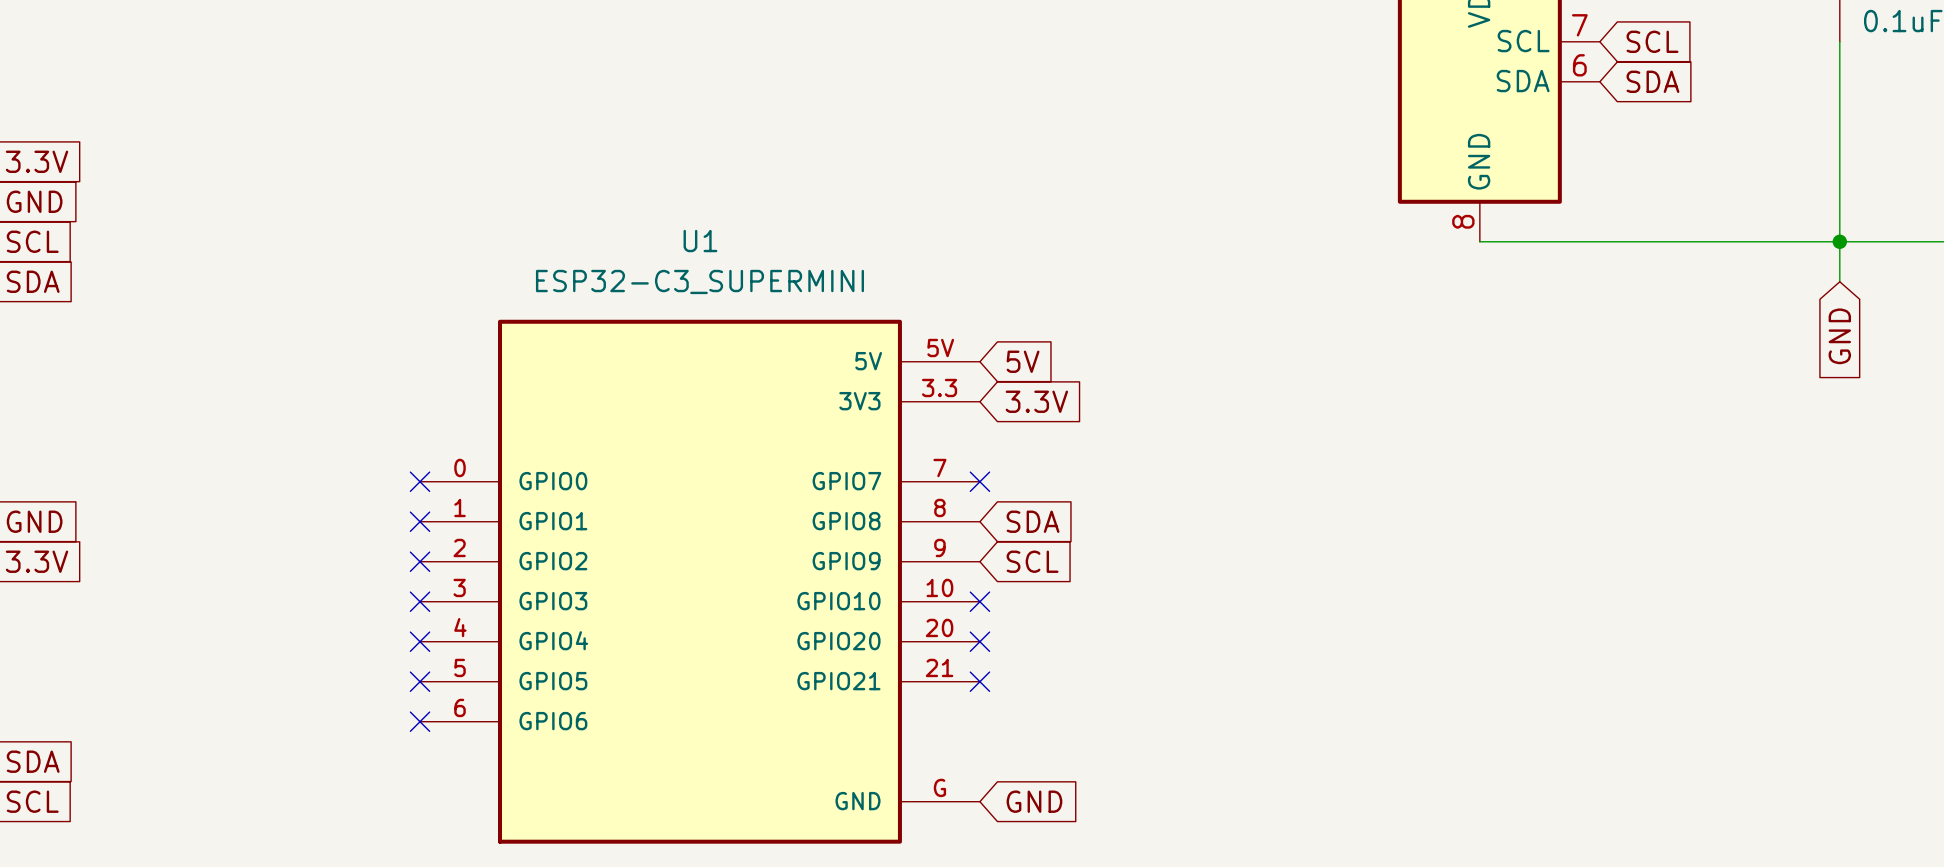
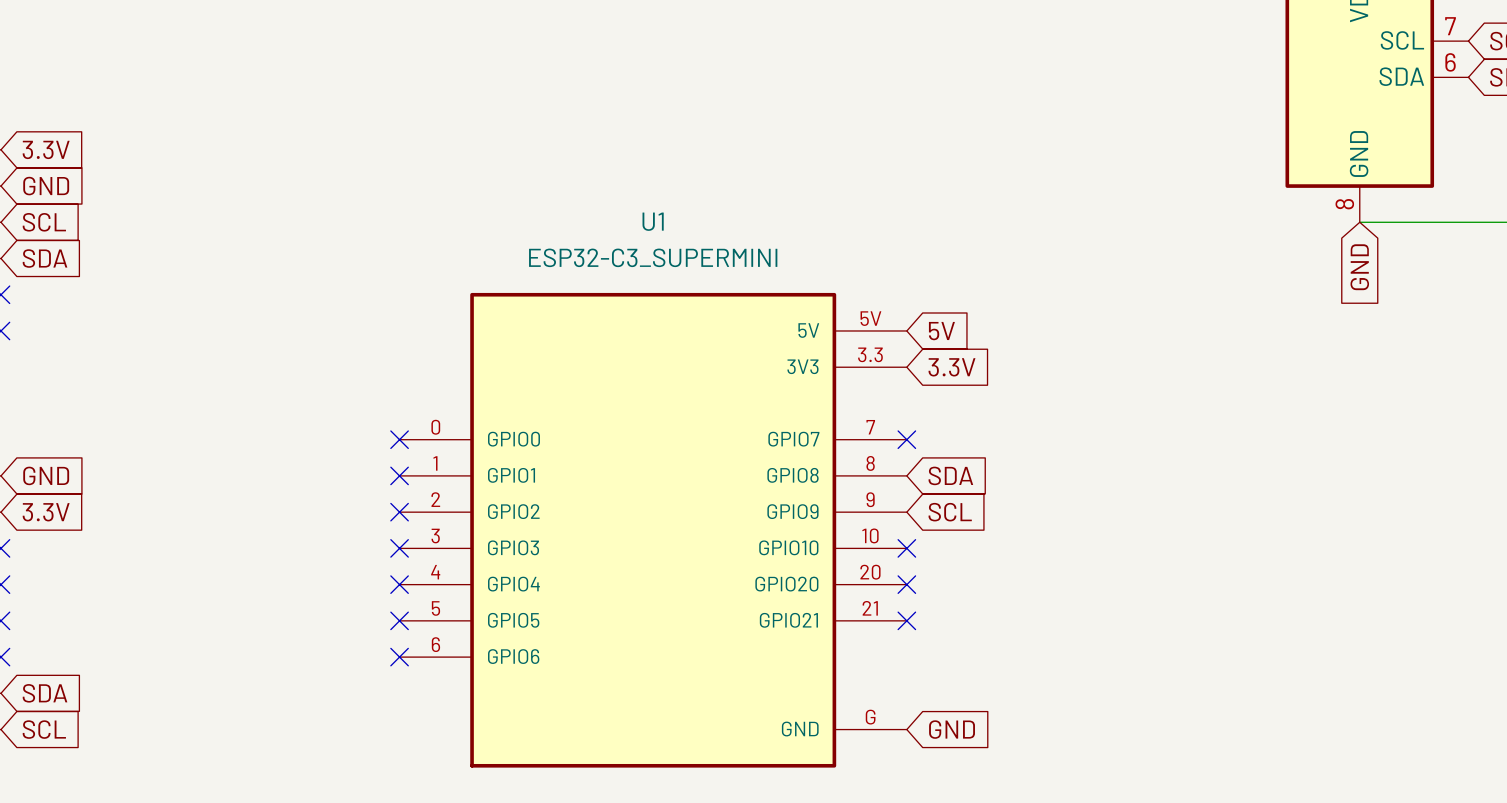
global label: none -> GND (1359, 267)

